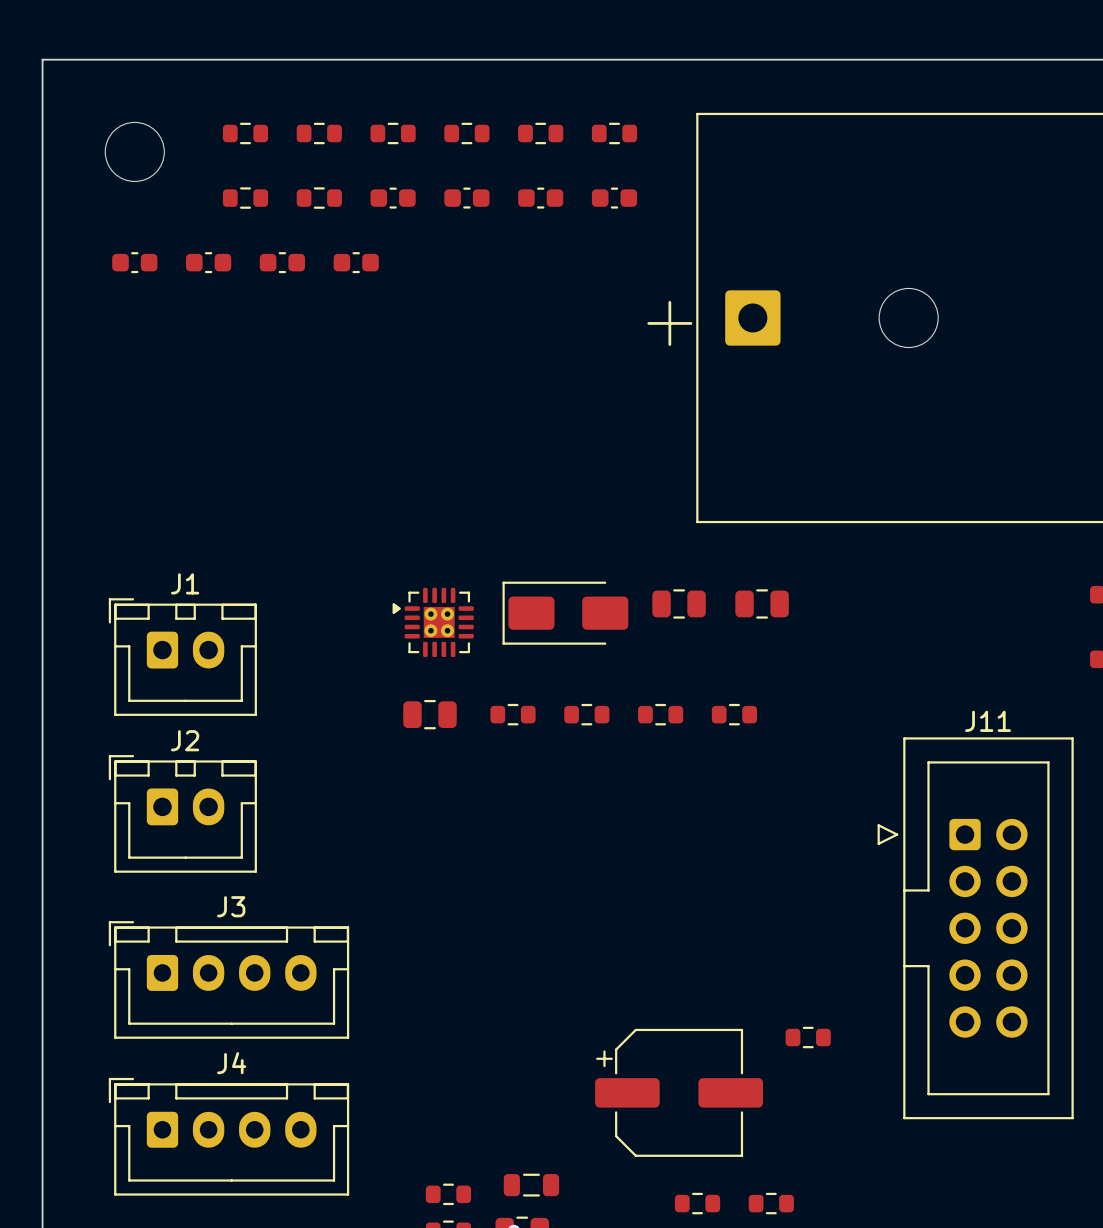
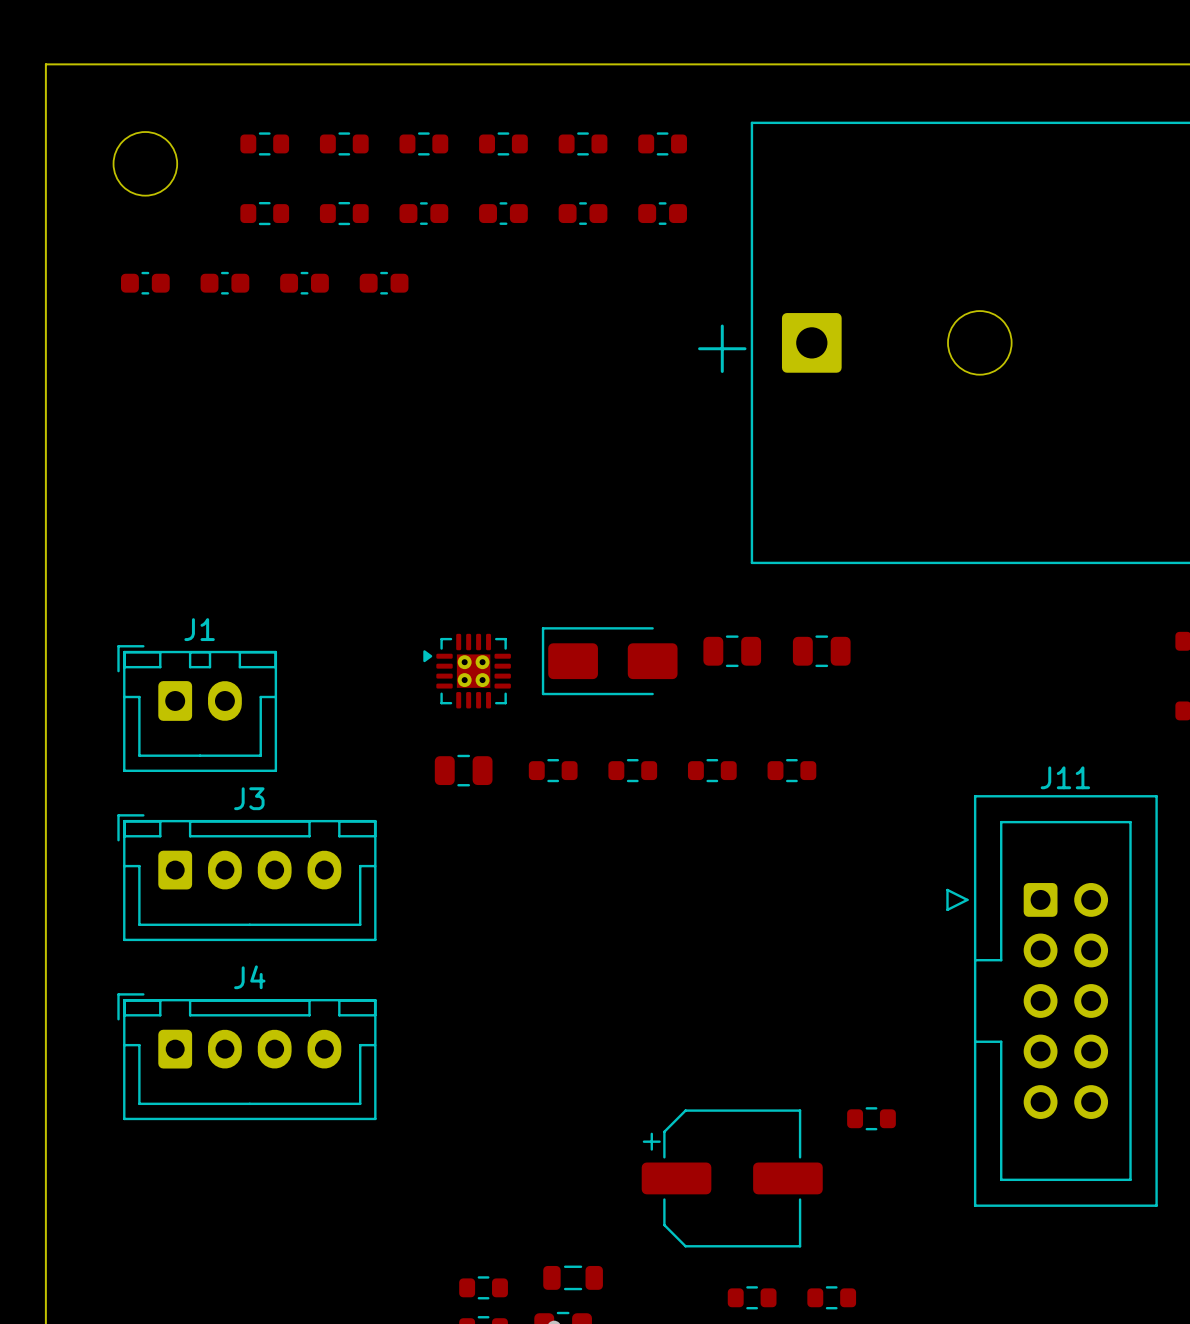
J2: (182, 813) -> none
J3: none -> (246, 877)
J3 name: J3 (231, 906) -> J4 (249, 977)
J4: (228, 1136) -> none

